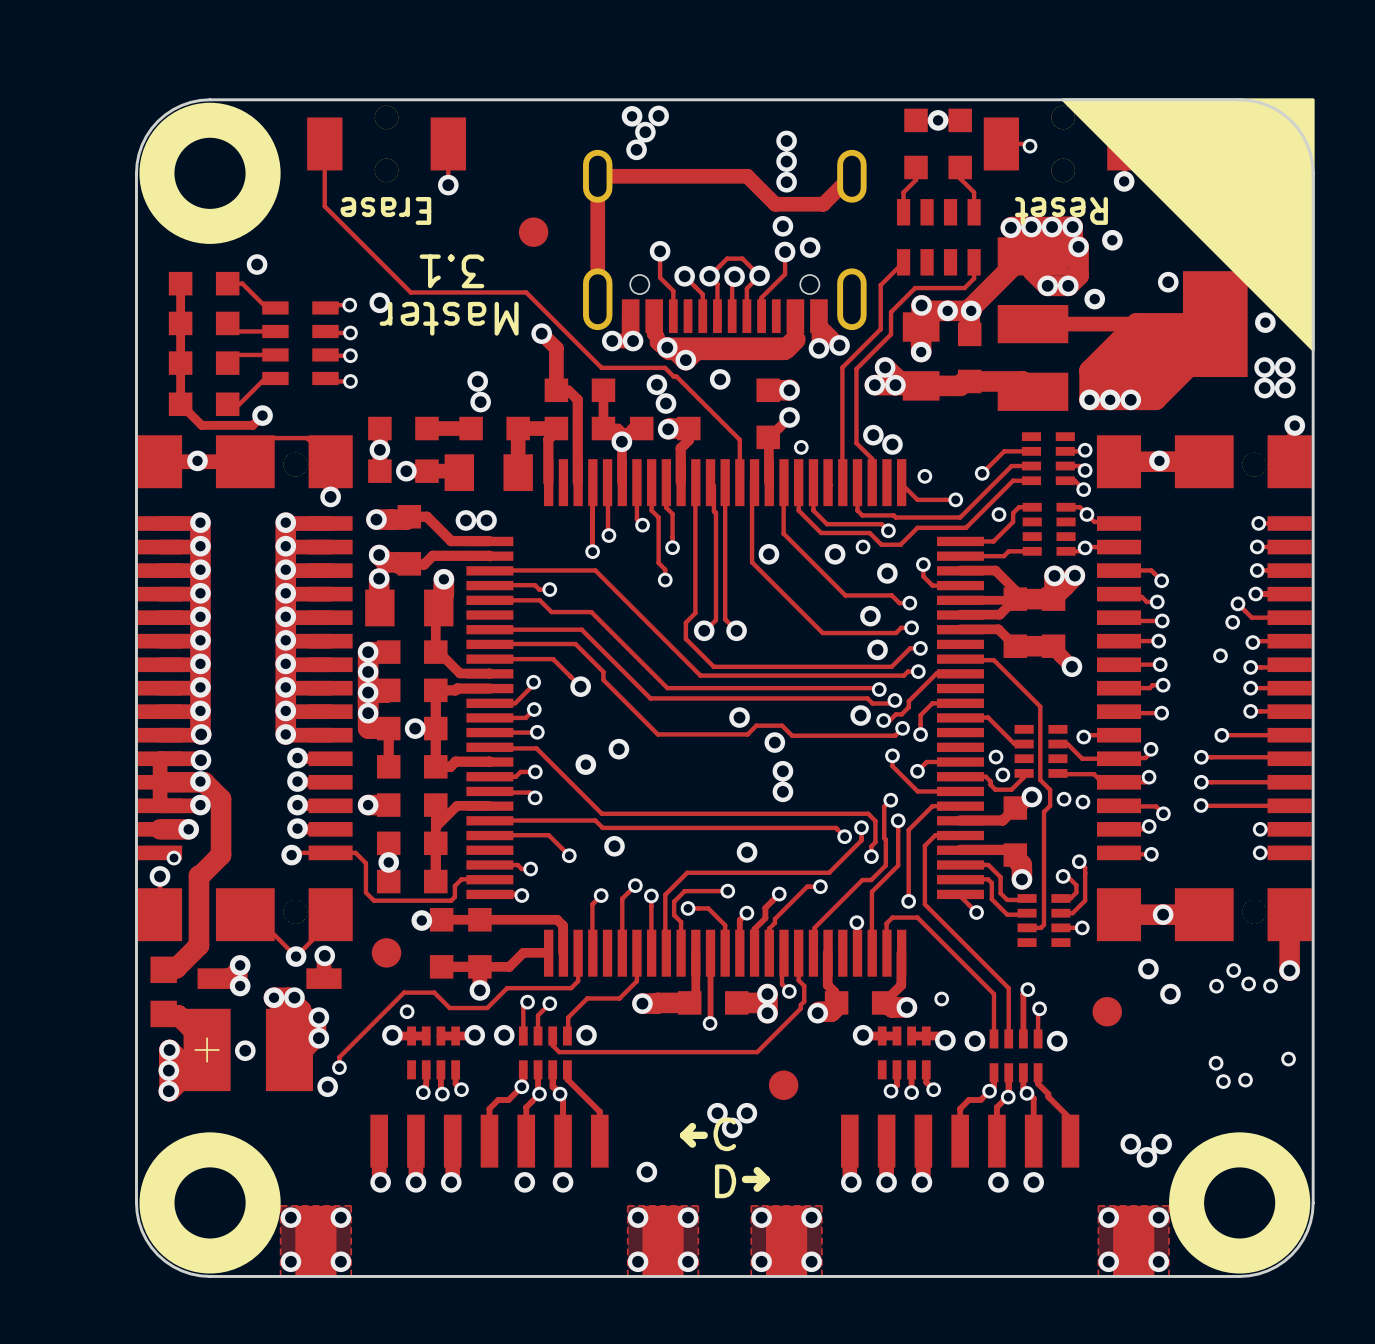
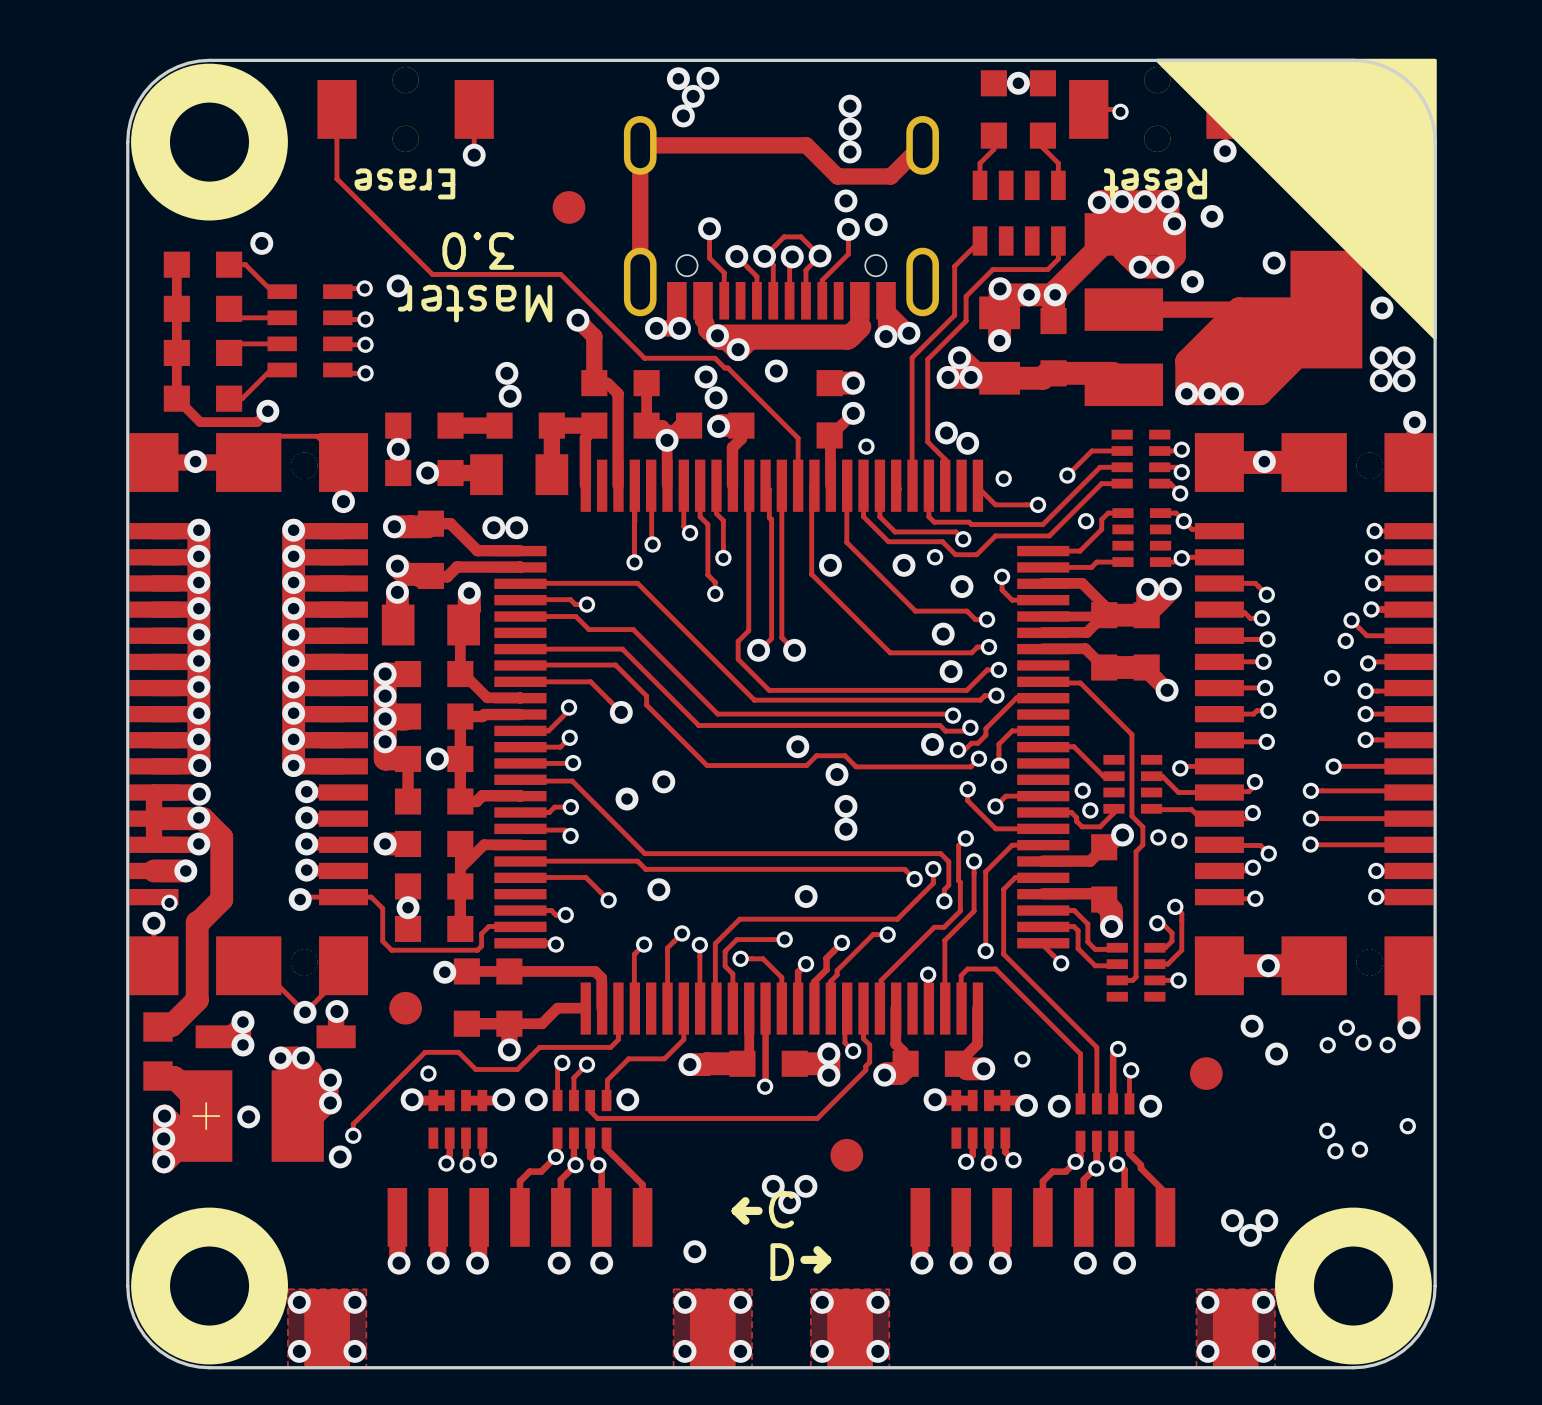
text: 3.1 (451, 271) -> 3.0 (478, 250)

